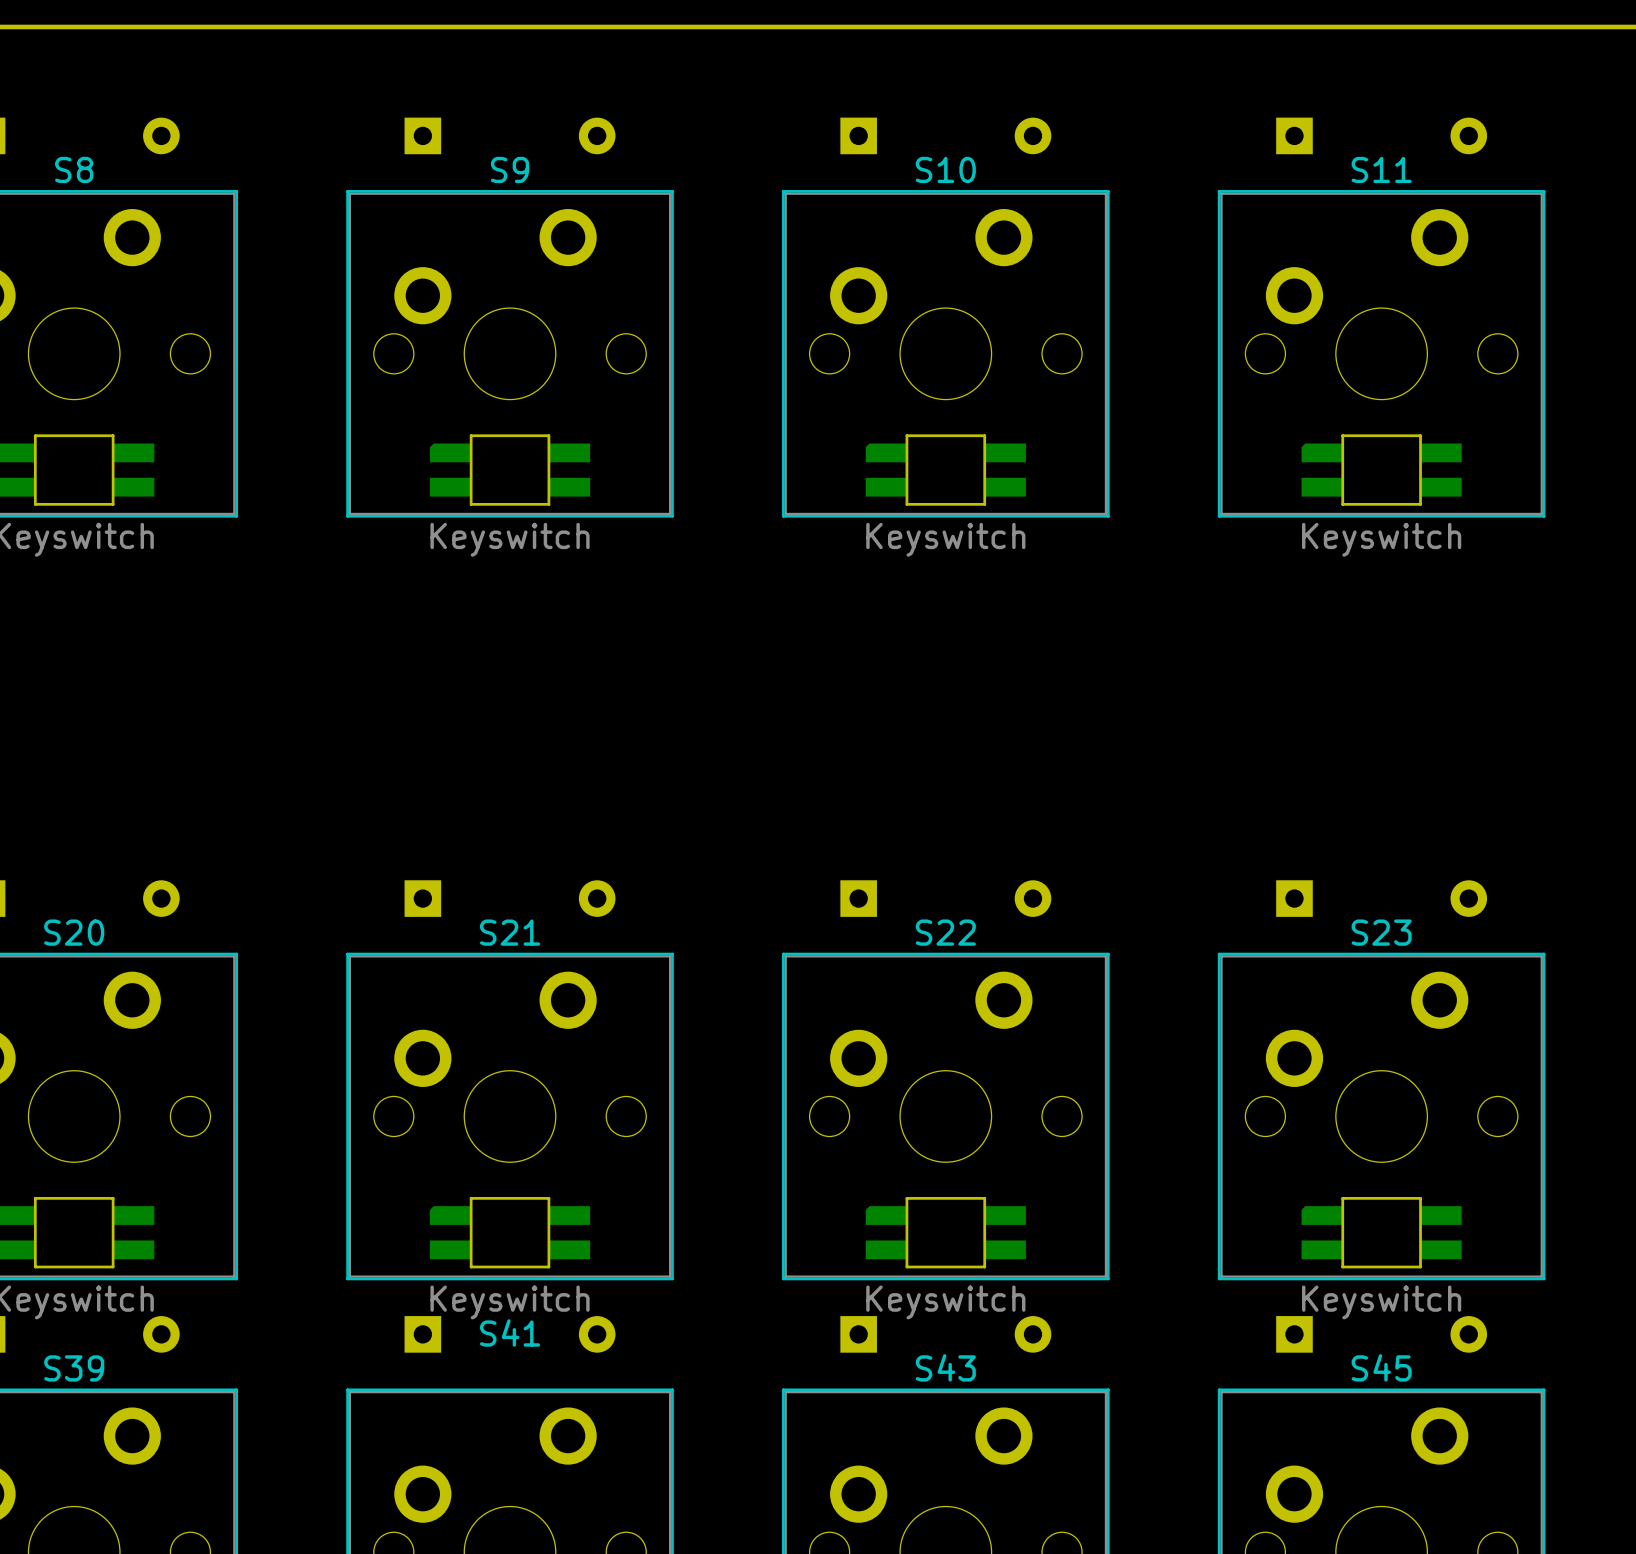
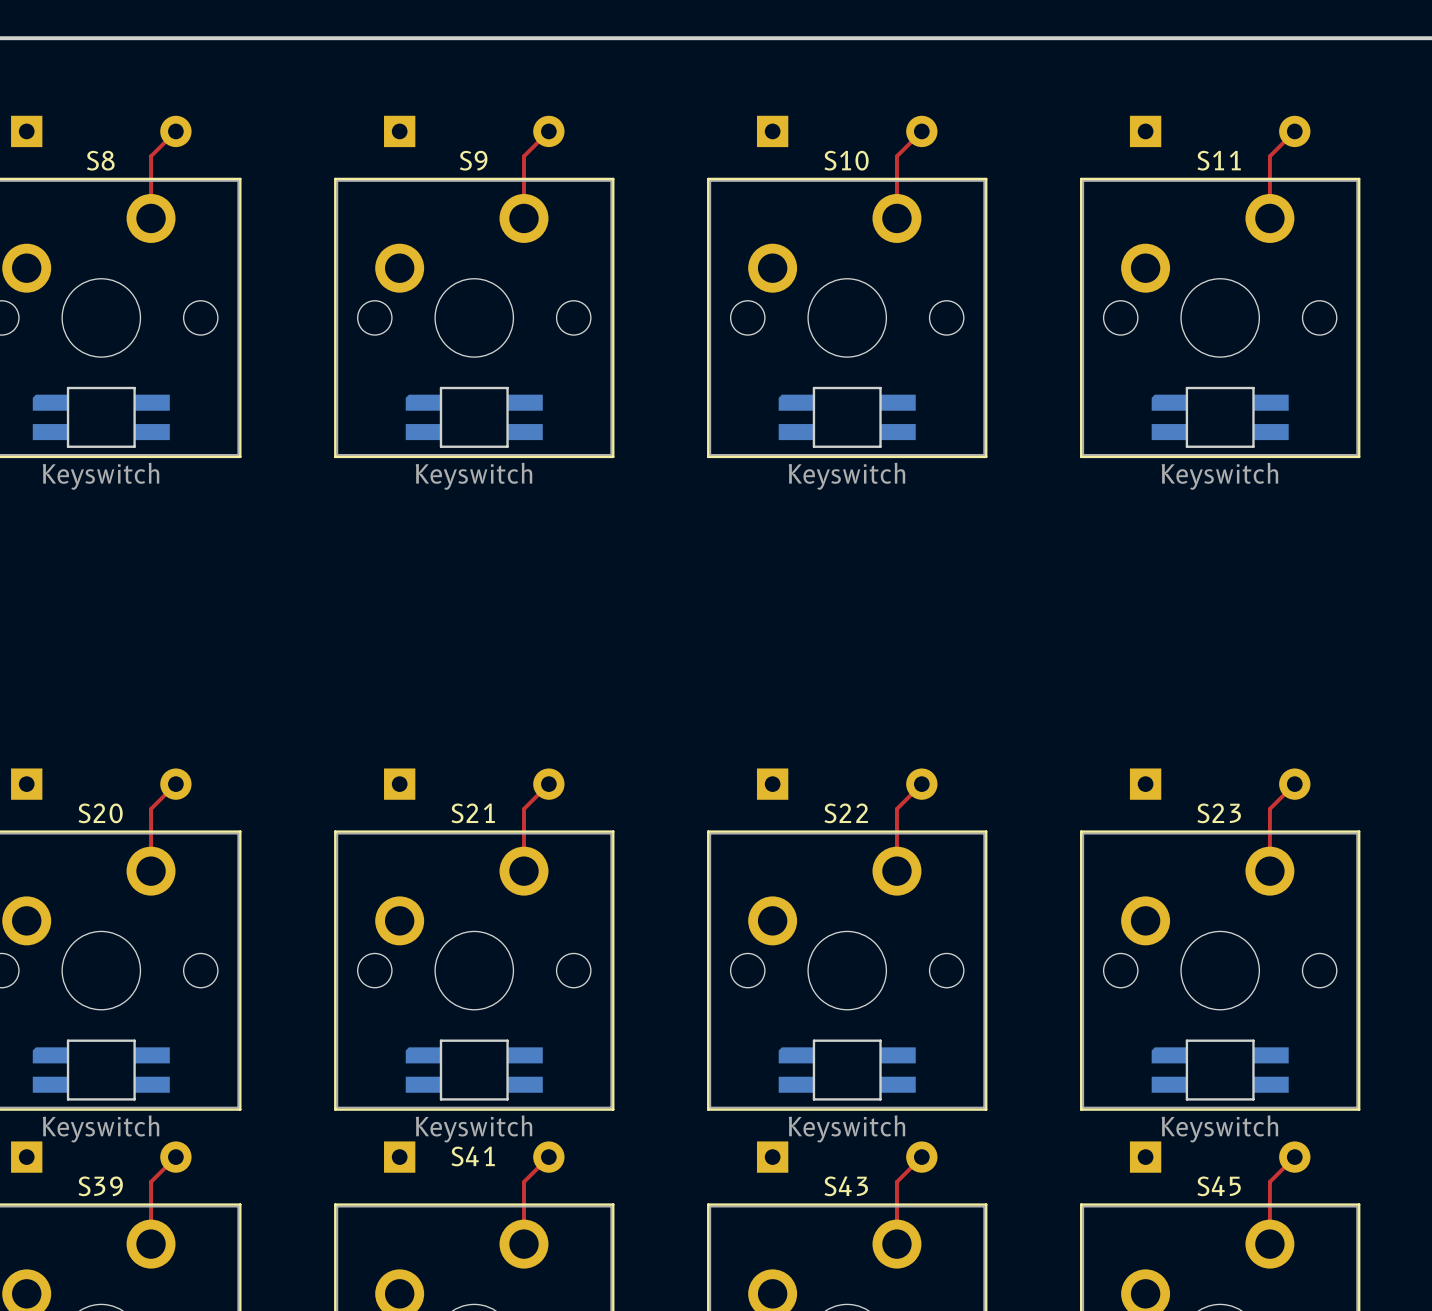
top track: none -> (175, 131) (151, 156) (151, 218)
top track: none -> (548, 131) (523, 156) (523, 218)
top track: none -> (921, 131) (896, 156) (896, 218)
top track: none -> (1294, 131) (1269, 156) (1269, 218)
top track: none -> (175, 784) (151, 808) (151, 871)
top track: none -> (548, 784) (523, 808) (523, 871)
top track: none -> (921, 784) (896, 808) (896, 871)
top track: none -> (1294, 784) (1269, 808) (1269, 871)
top track: none -> (175, 1157) (151, 1181) (151, 1244)
top track: none -> (548, 1157) (523, 1181) (523, 1244)
top track: none -> (921, 1157) (896, 1181) (896, 1244)
top track: none -> (1294, 1157) (1269, 1181) (1269, 1244)

